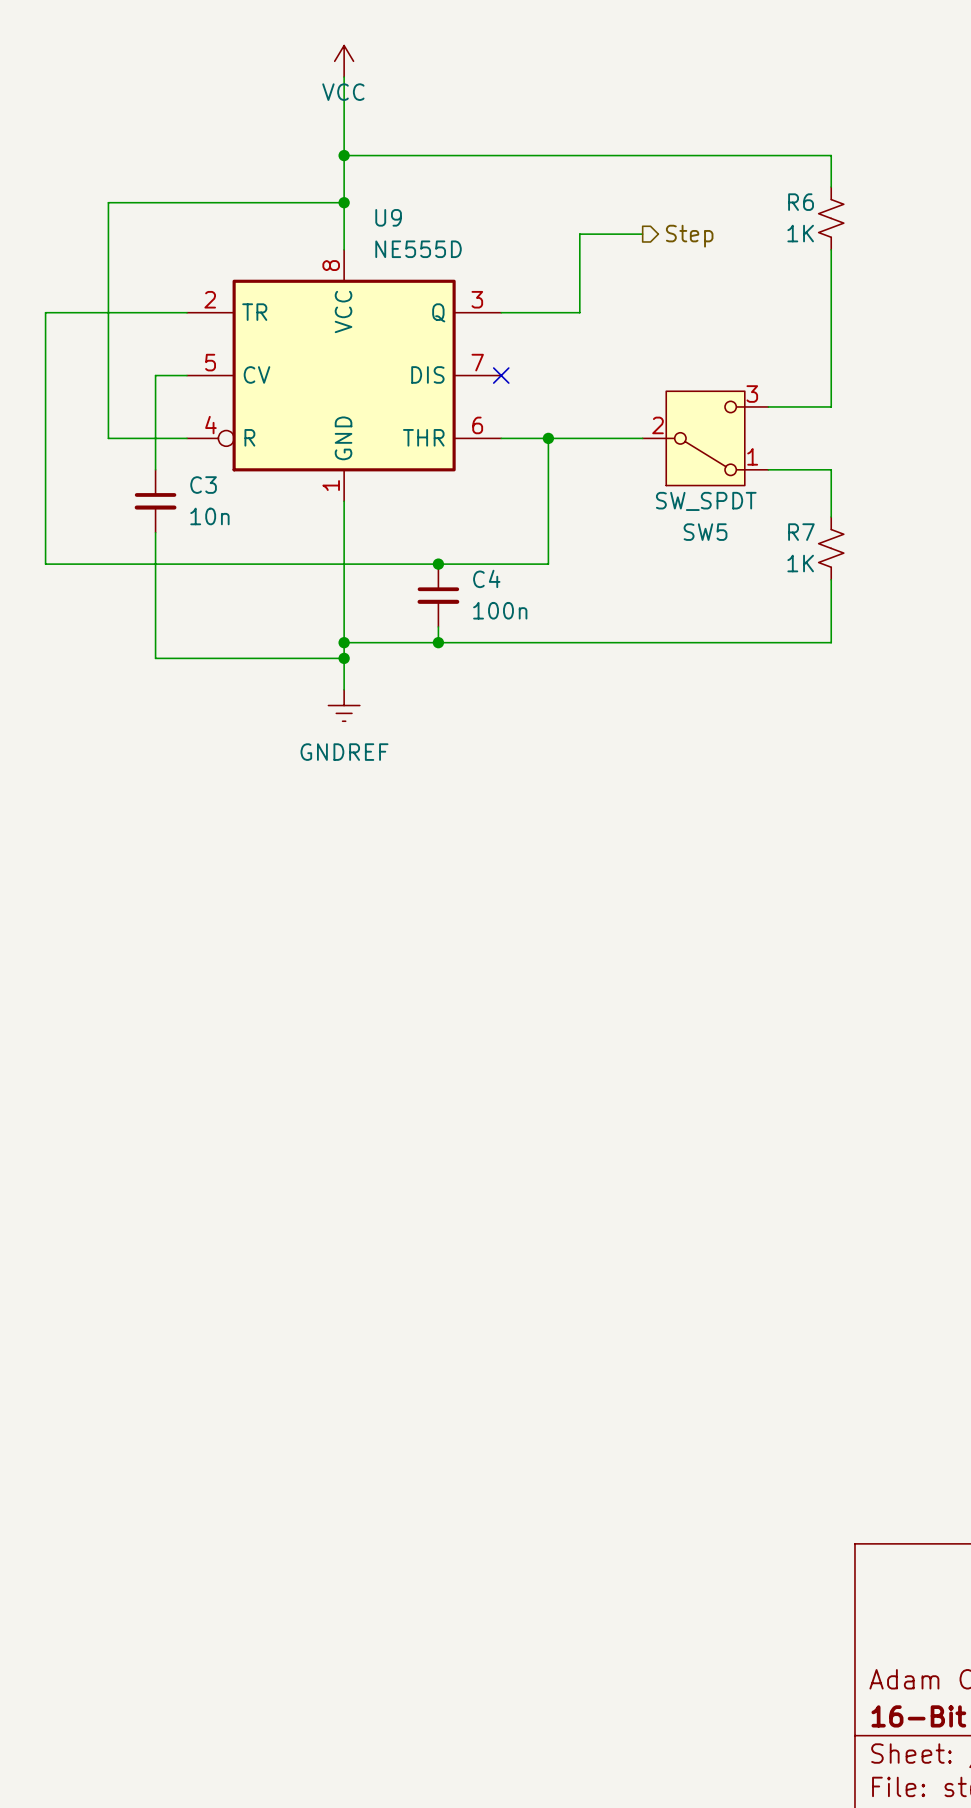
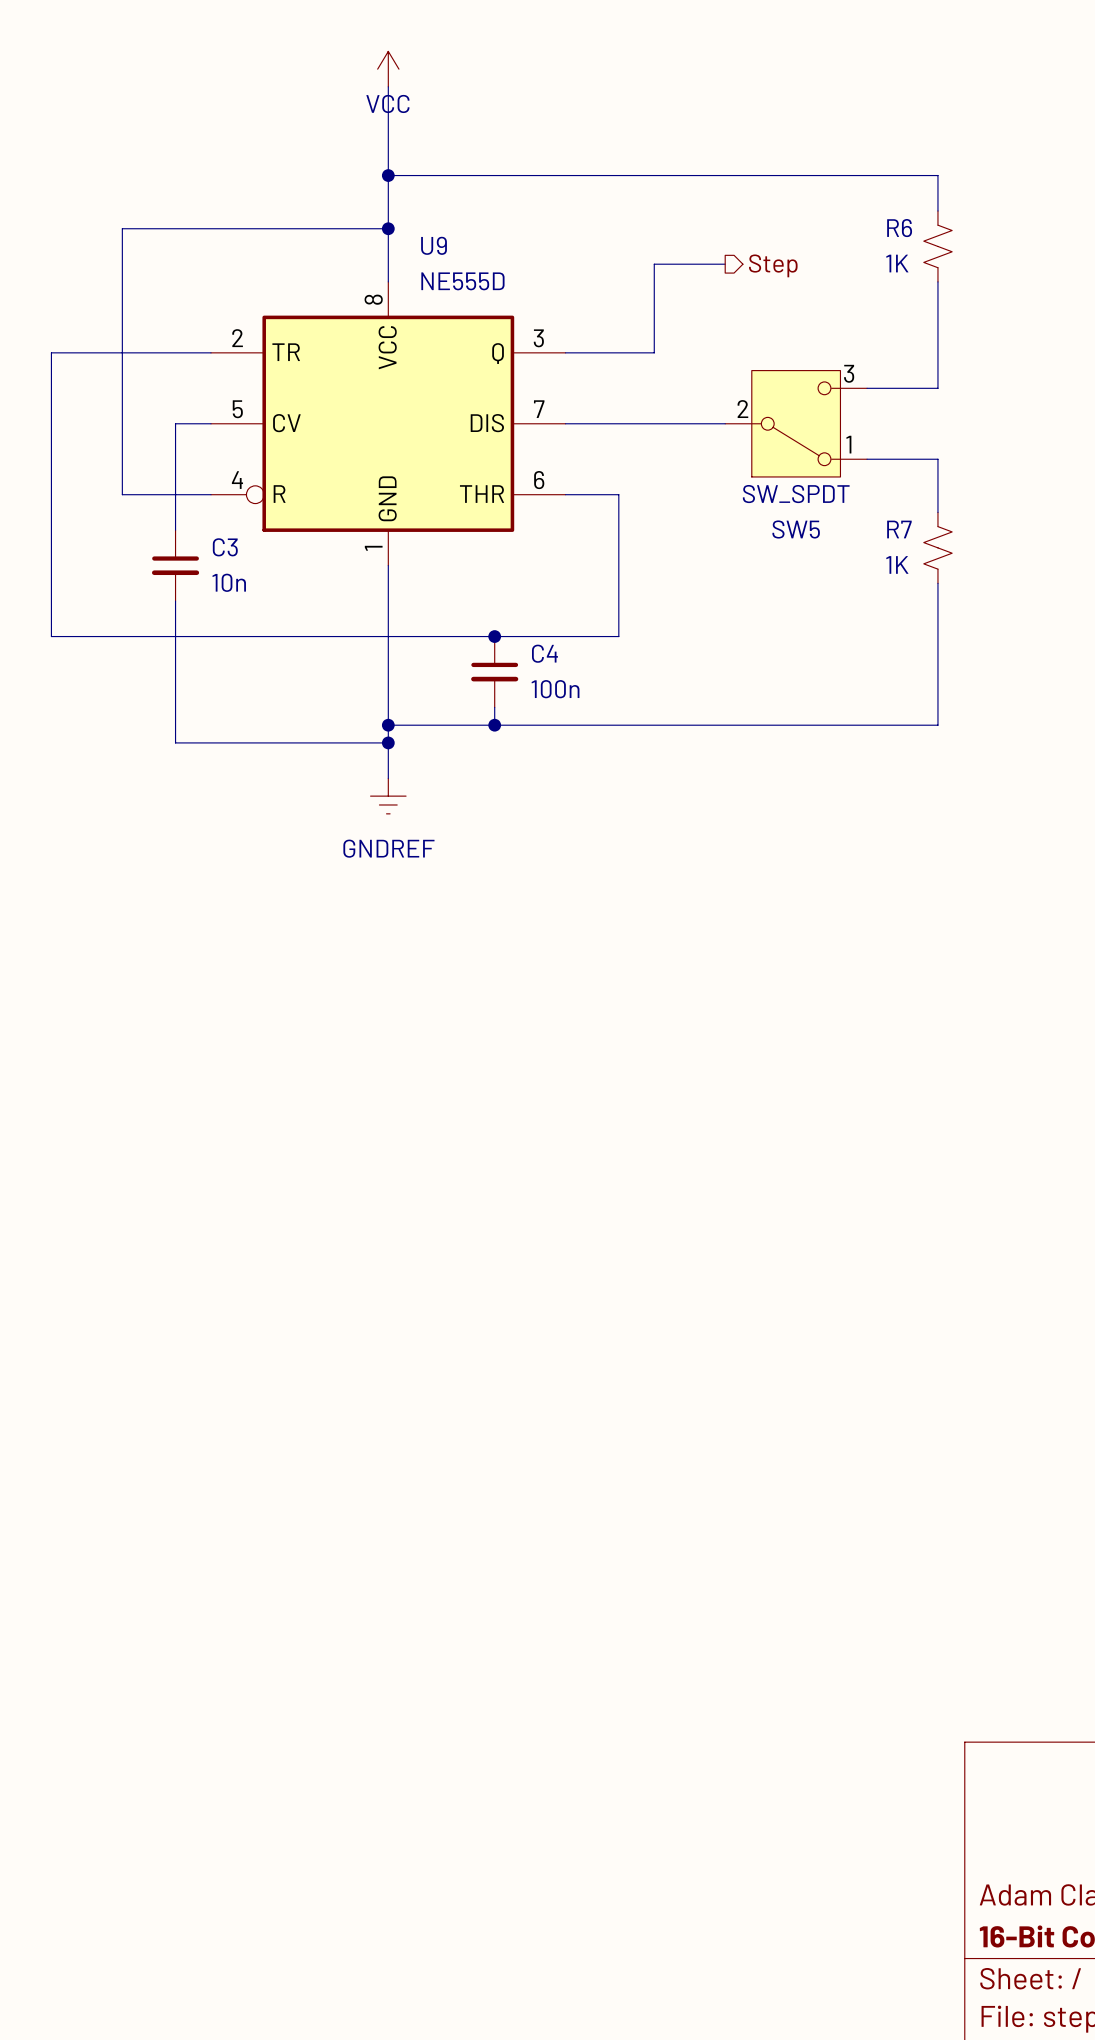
wire: (831, 344) (831, 406) -> (937, 388) (867, 388)
wire: none -> (565, 423) (725, 423)
no-connect mark: (501, 375) -> none
wire: none -> (937, 459) (937, 512)
wire: (548, 438) (642, 438) -> none
junction: (548, 438) -> none
SW5 position: (705, 438) -> (796, 423)
wire: (768, 469) (831, 469) (831, 516) -> (937, 654) (937, 583)
R7 position: (831, 548) -> (937, 547)

